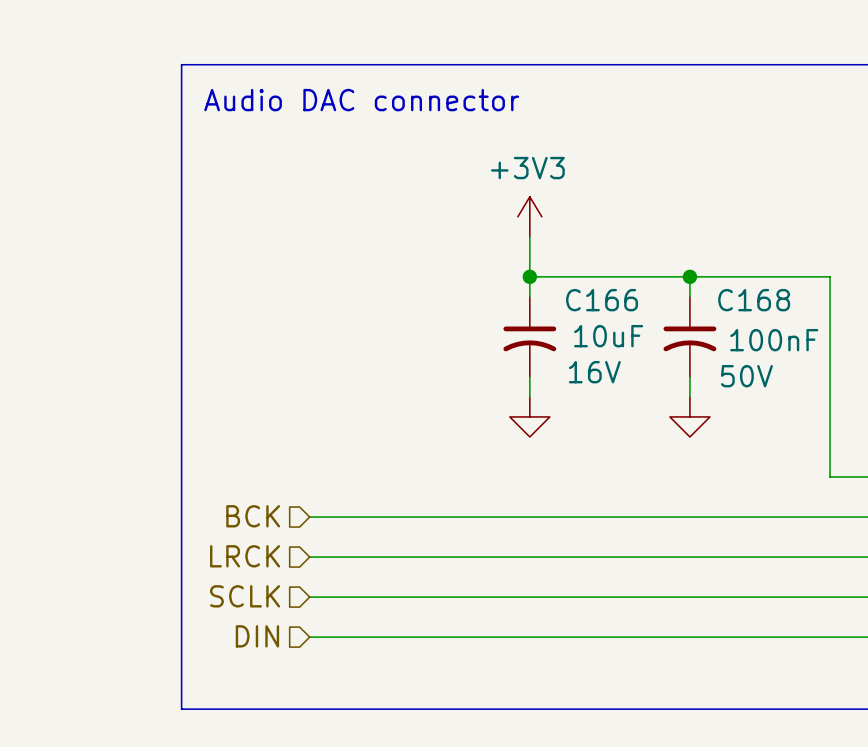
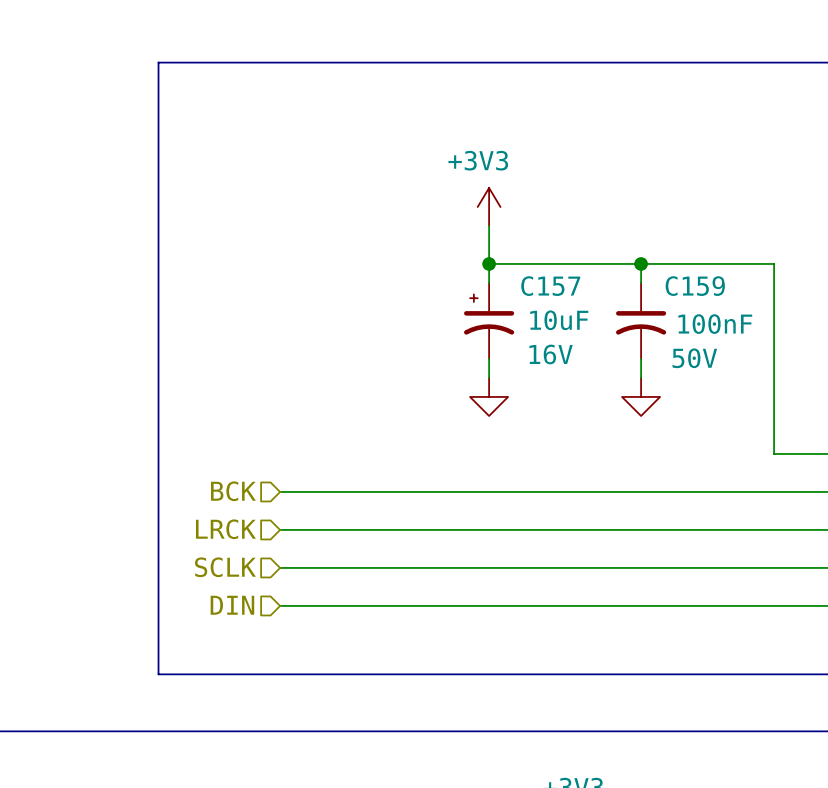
text: Audio DAC connector (361, 100) -> none
C168 name: C168 (754, 300) -> C159 (695, 286)
C166: 10uF (529, 336) -> none
C157: none -> 10uF (489, 320)

